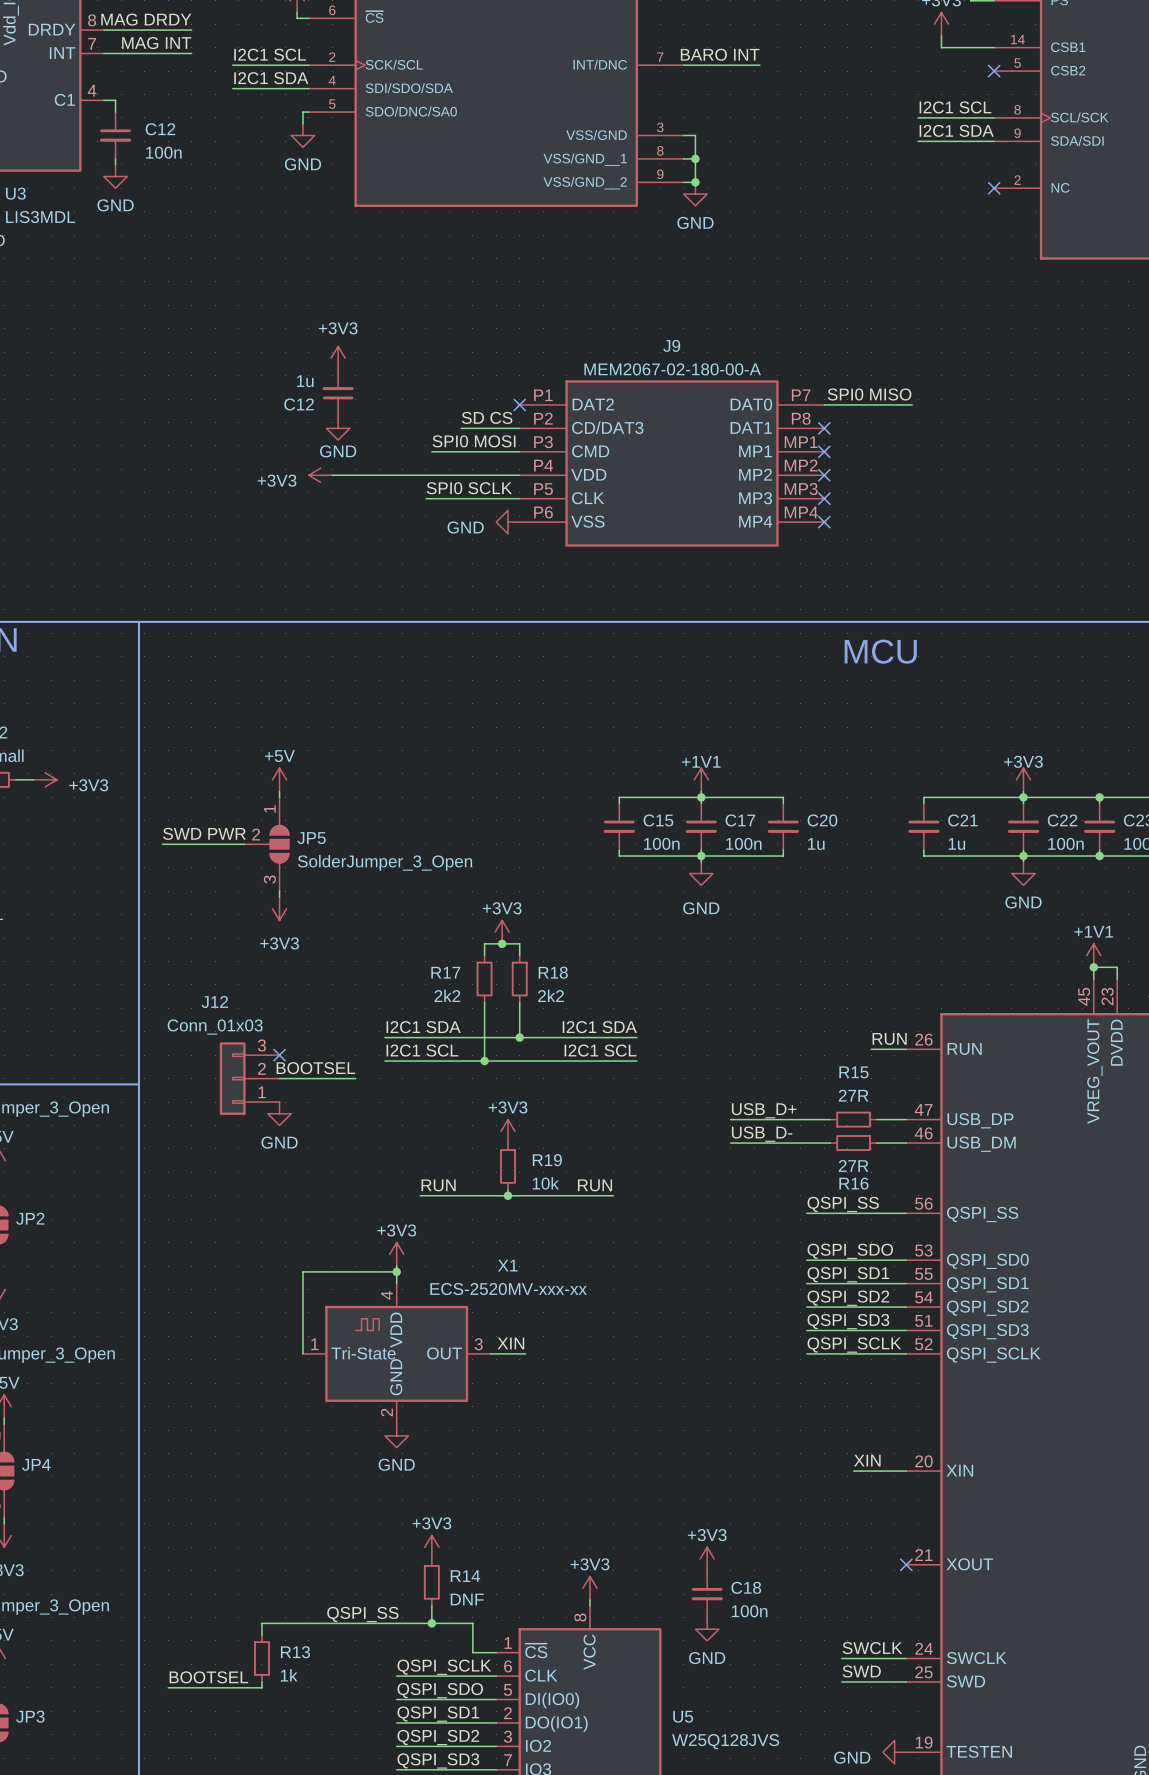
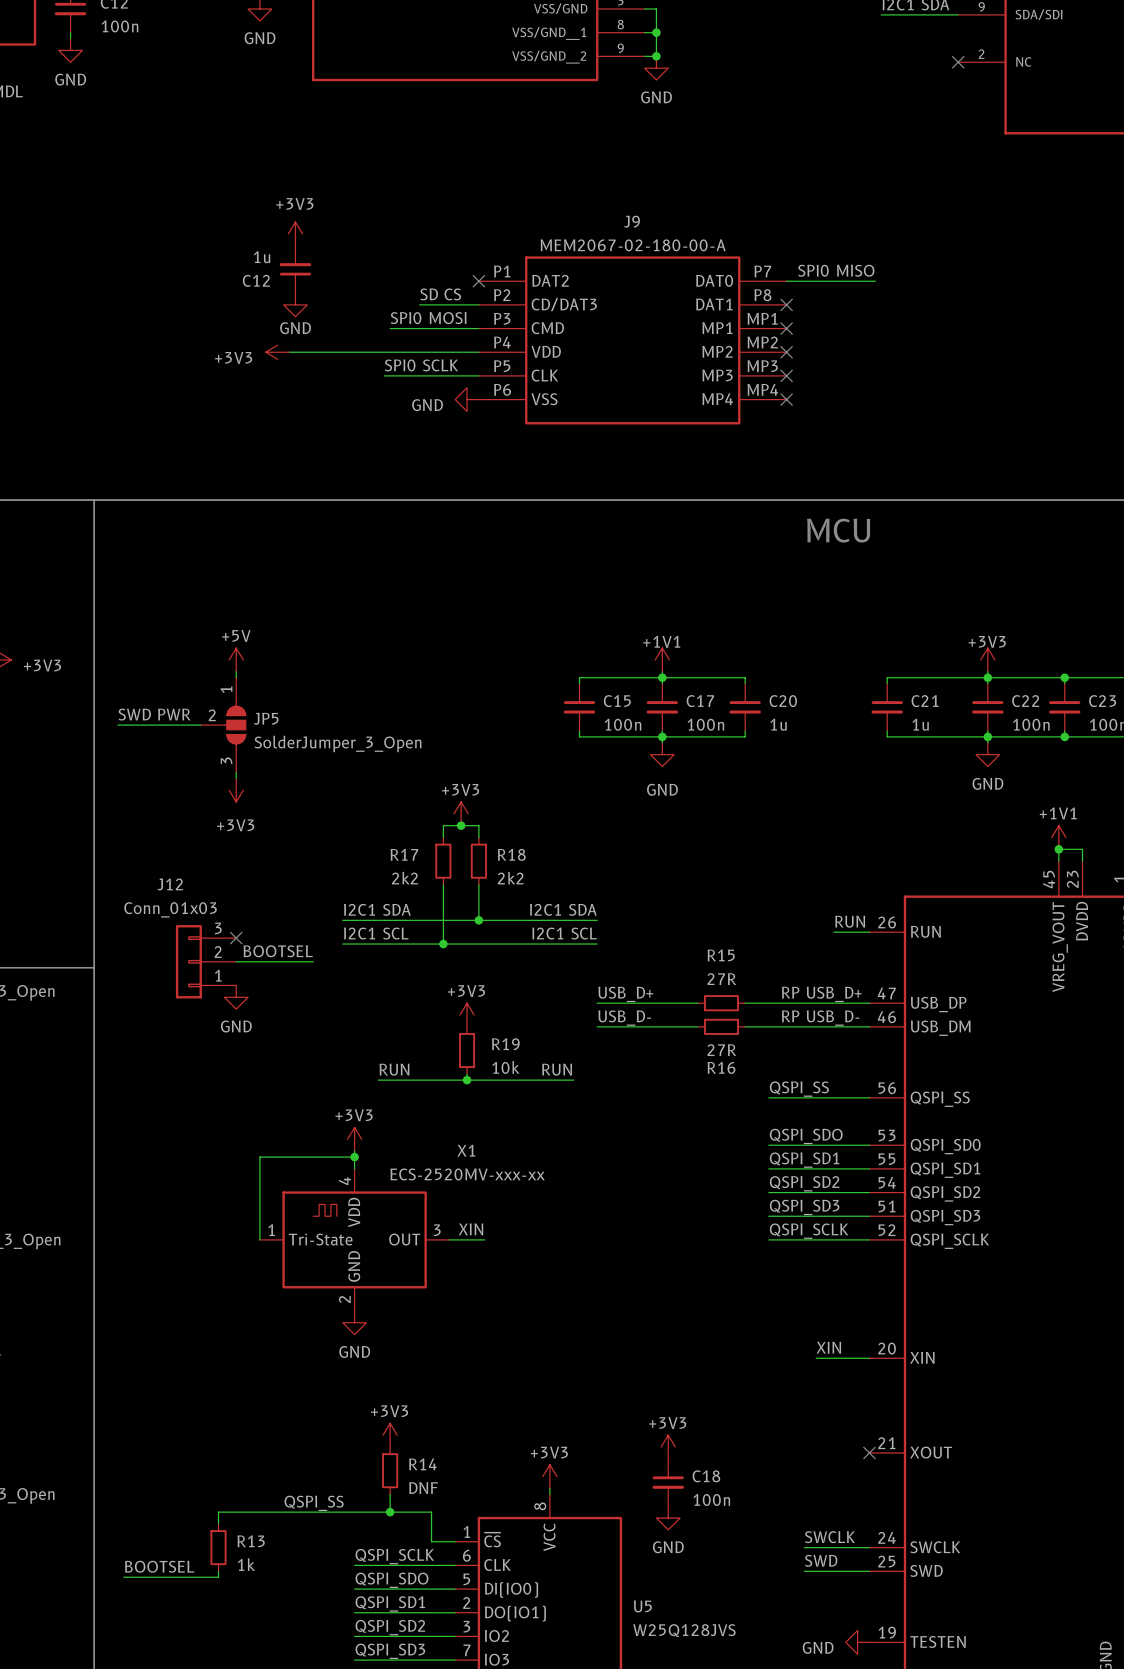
label position: USB_D+ (764, 1110) -> USB_D+ (625, 994)
label: none -> RP USB_D+ (821, 994)
wire: none -> (597, 1003) (691, 1003)
wire: (736, 1119) (783, 1119) -> (792, 1003) (839, 1003)
R15 position: (853, 1119) -> (721, 1003)
label position: USB_D- (762, 1134) -> USB_D- (624, 1018)
label: none -> RP USB_D- (820, 1018)
wire: none -> (597, 1026) (691, 1026)
wire: (736, 1143) (783, 1143) -> (792, 1026) (839, 1026)
R16 position: (853, 1143) -> (721, 1026)

